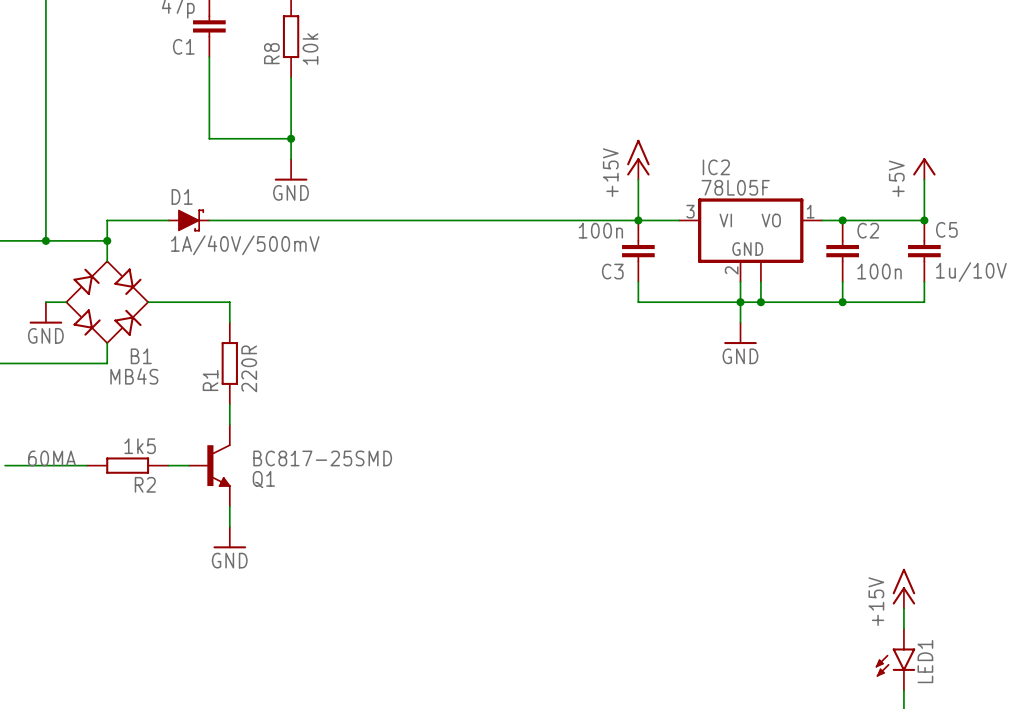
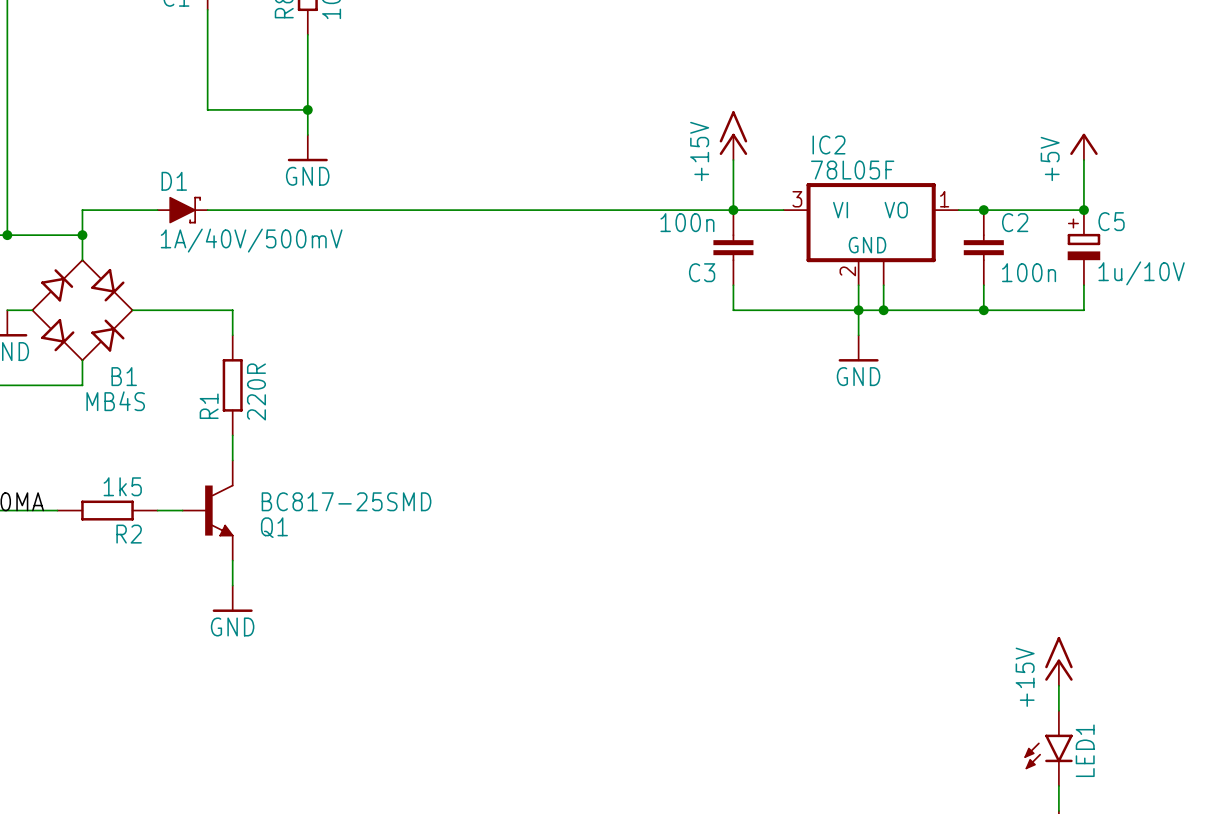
C5 symbol: [908, 220, 941, 282] -> [1067, 210, 1101, 286]

